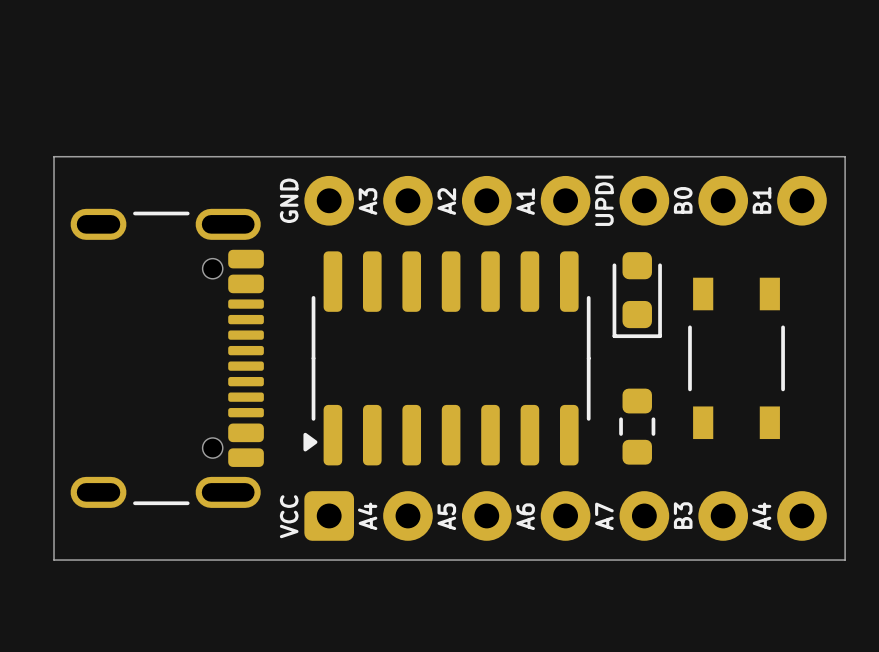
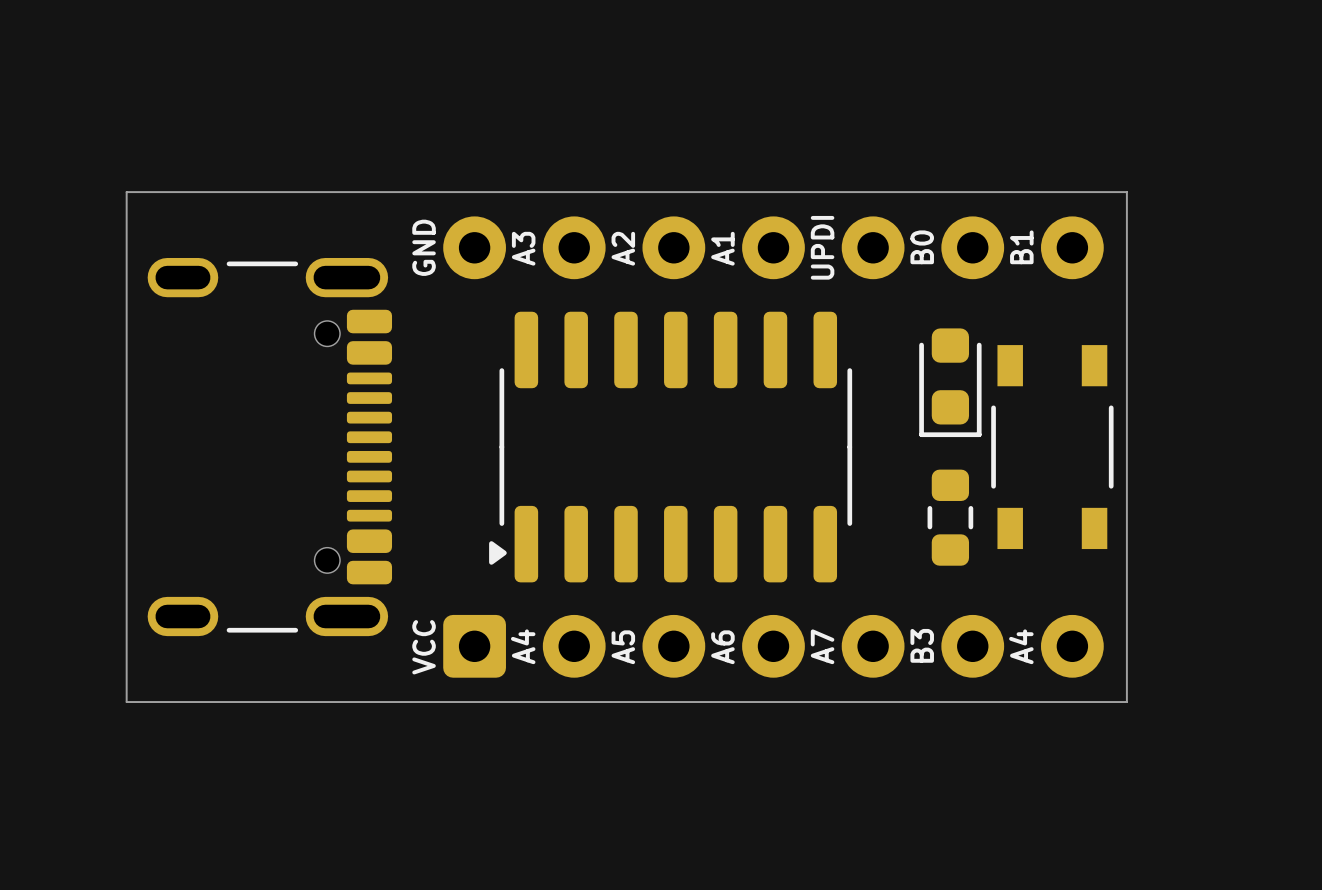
part position: (637, 295) -> (950, 382)
part position: (446, 358) -> (670, 447)
part position: (736, 358) -> (1052, 447)
part position: (637, 426) -> (950, 517)

